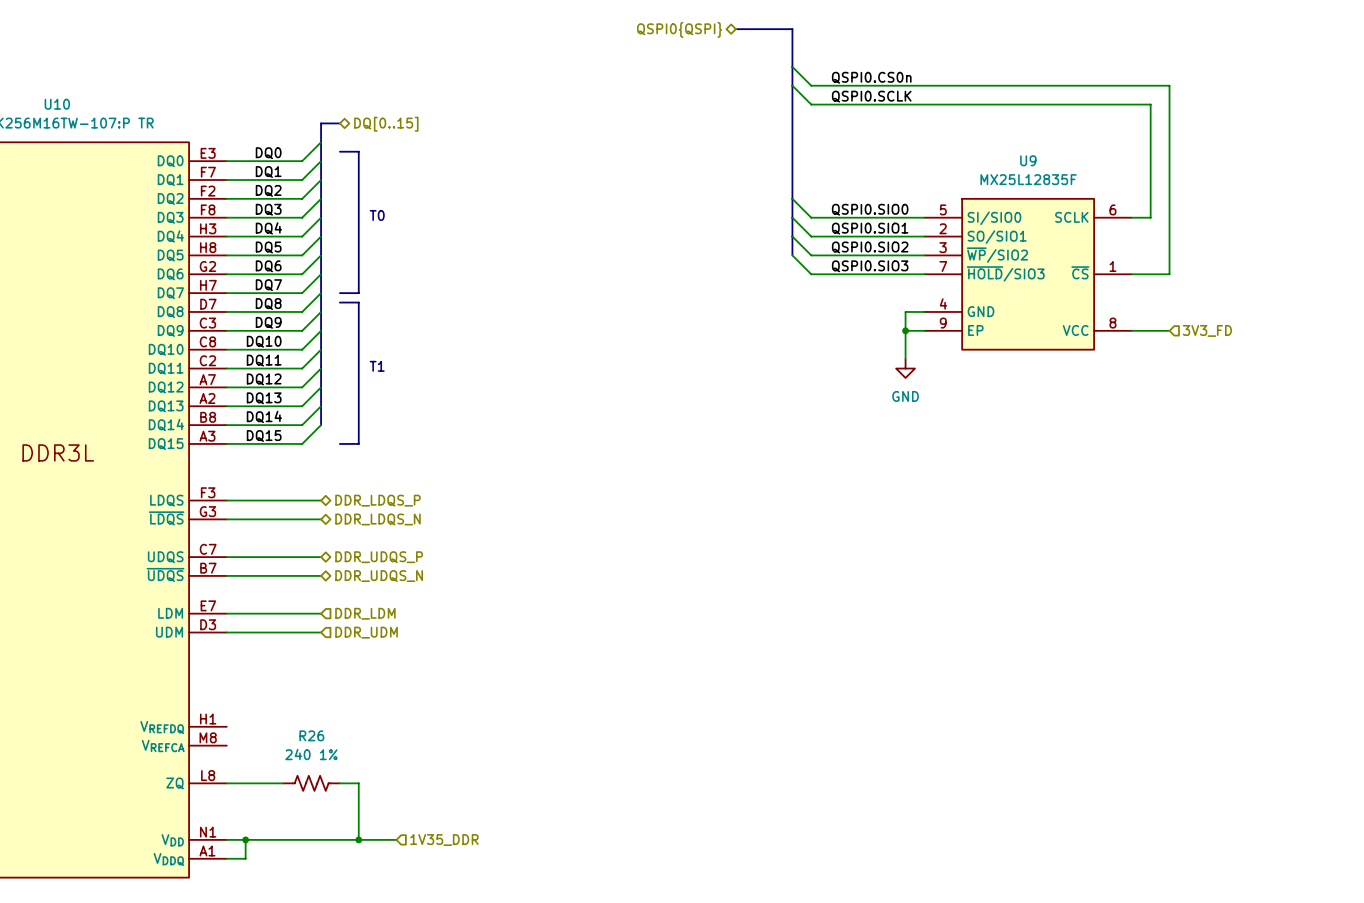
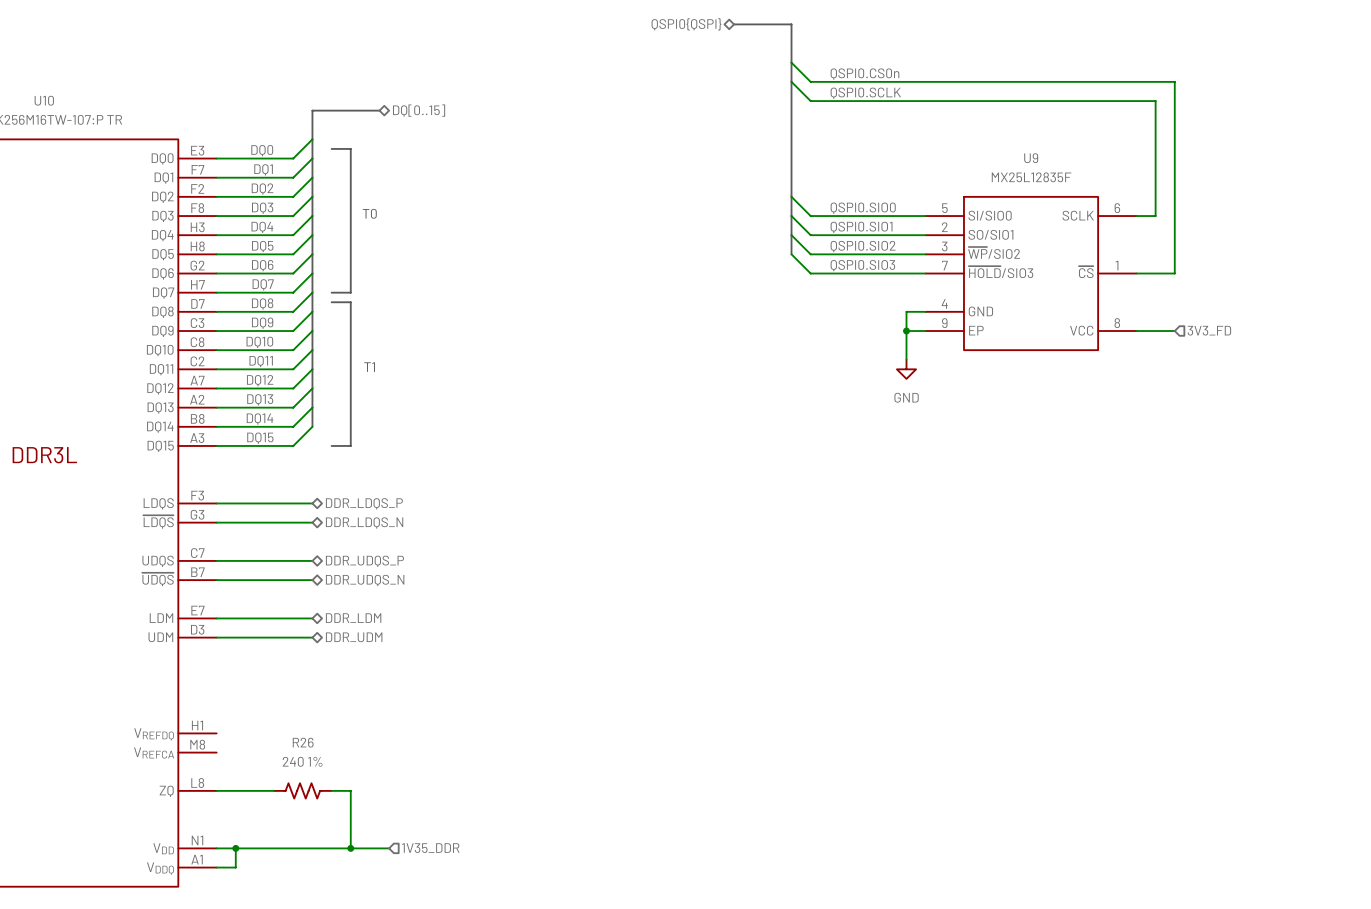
bus: (321, 123) (339, 123) -> (312, 120) (312, 110) (379, 110)
hierarchical label position: DQ[0..15] (386, 124) -> DQ[0..15] (419, 110)
hierarchical label shape: input (365, 613) -> bidirectional (353, 618)
hierarchical label shape: input (366, 632) -> bidirectional (354, 637)

